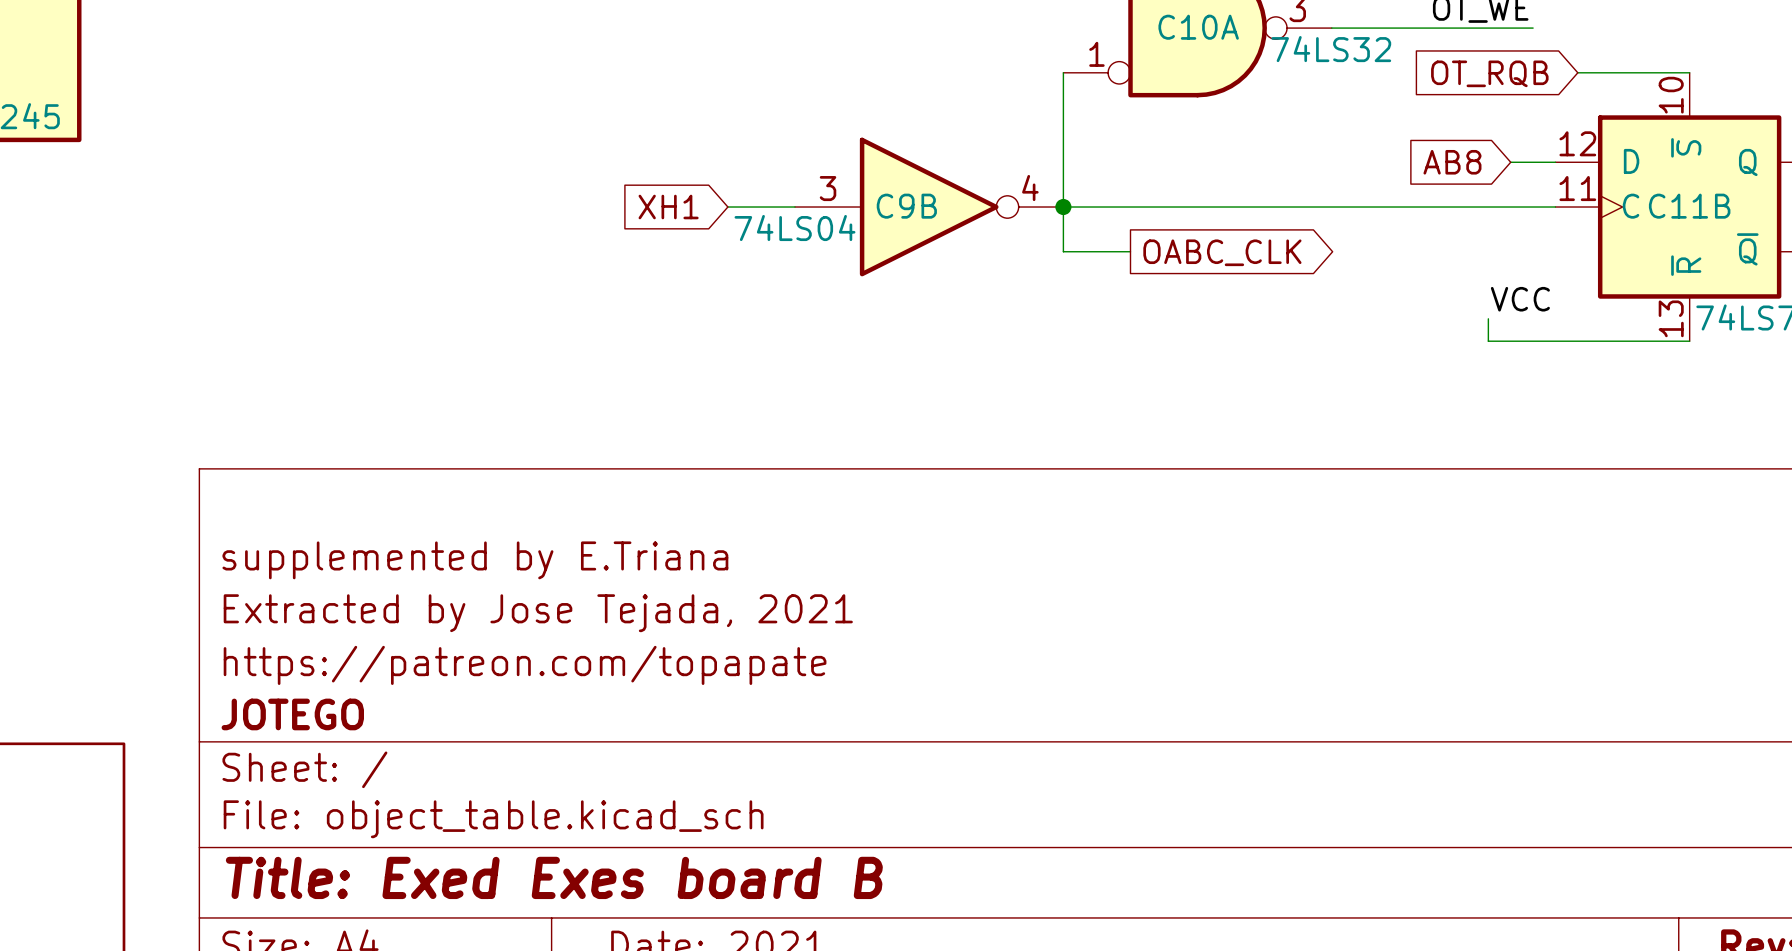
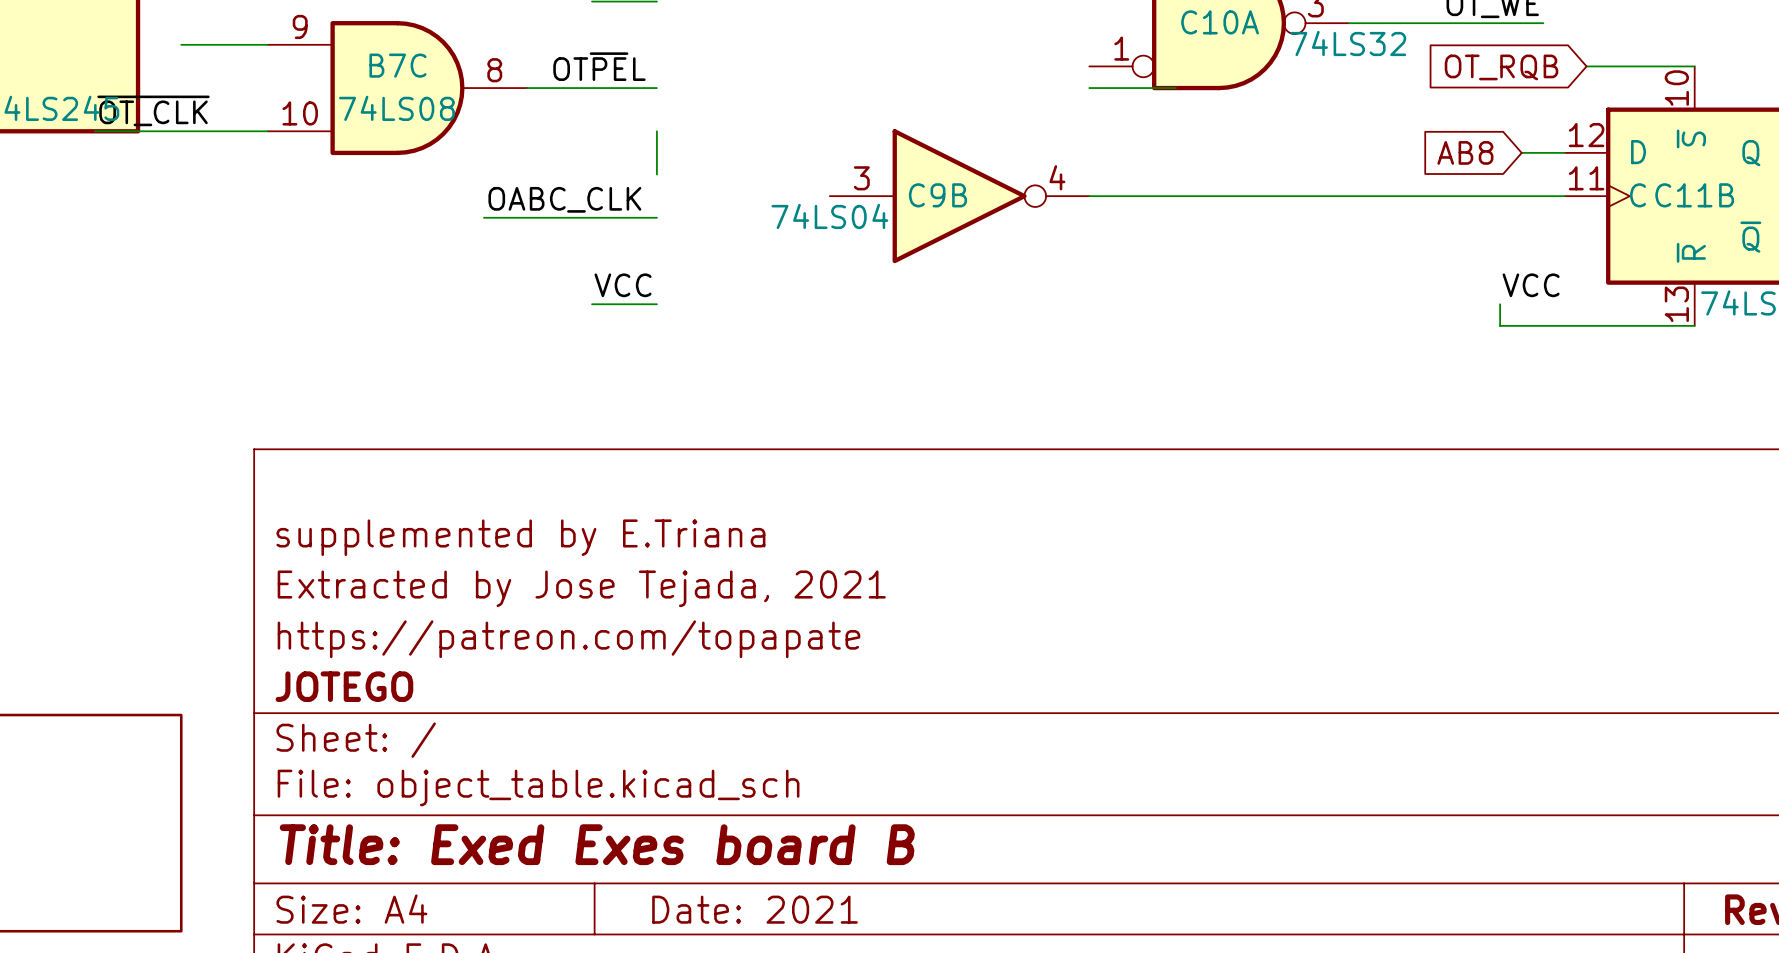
wire: none -> (592, 1) (656, 1)
wire: none -> (181, 44) (267, 44)
wire: (1063, 72) (1063, 251) (1130, 251) -> none
label: none -> OT~{PE}L (599, 66)
B7C: none -> 74LS08 (397, 88)
wire: none -> (527, 88) (656, 88)
wire: none -> (1089, 88) (1175, 88)
label: none -> ~{OT_CLK} (153, 110)
wire: none -> (94, 131) (267, 131)
wire: none -> (656, 131) (656, 174)
global label: XH1 (668, 207) -> none
wire: (727, 207) (794, 207) -> (592, 304) (656, 304)
junction: (1063, 207) -> none
label: none -> OABC_CLK (564, 199)
wire: none -> (483, 217) (656, 217)
global label: OABC_CLK (1222, 252) -> none
label: none -> VCC (623, 285)

